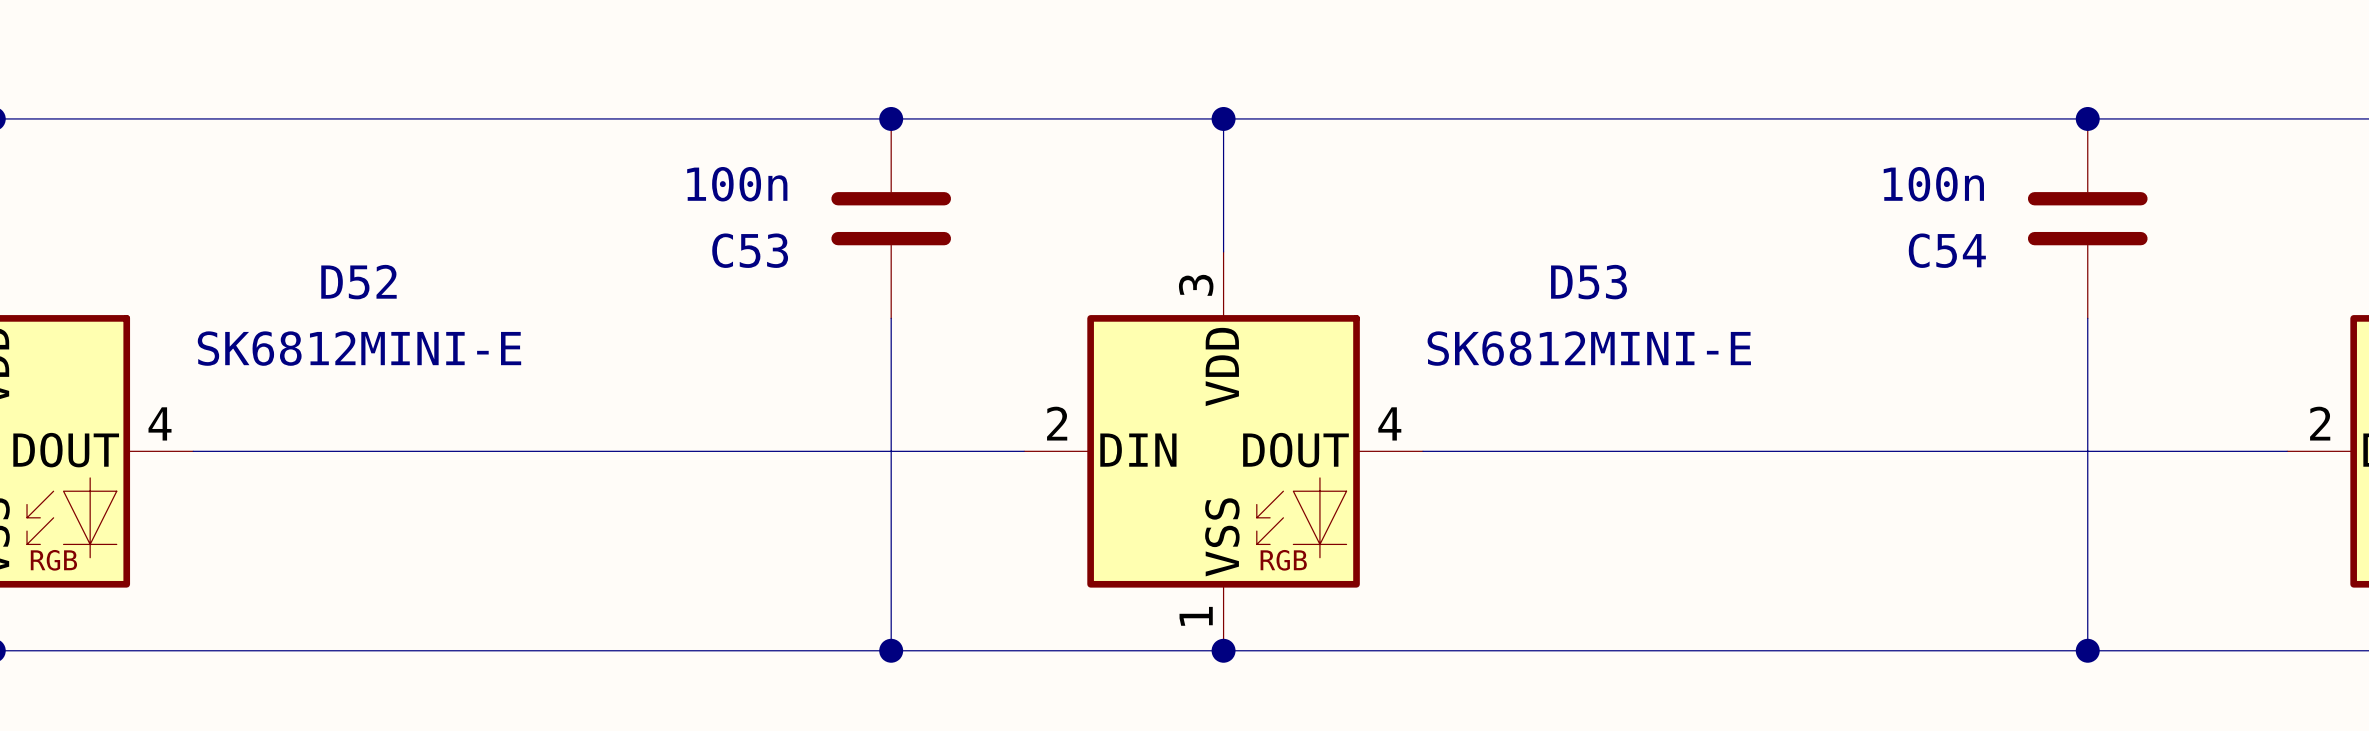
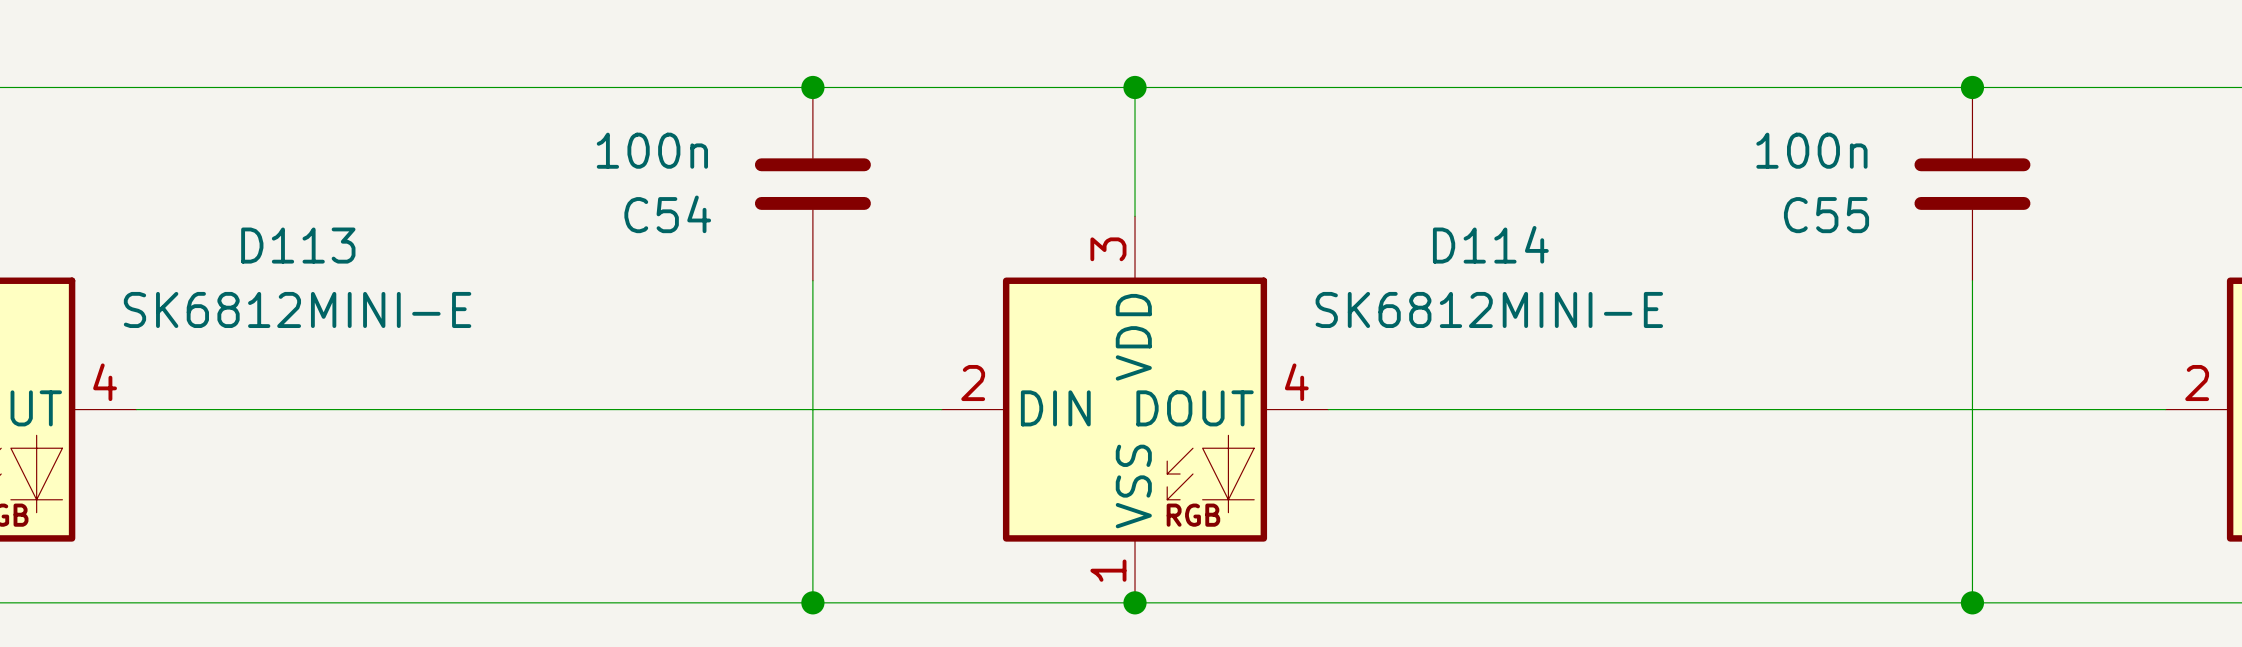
C53 name: C53 (750, 250) -> C54 (667, 214)
C54 name: C54 (1947, 250) -> C55 (1826, 215)
D52 name: D52 (358, 282) -> D113 (298, 245)
D53 name: D53 (1588, 282) -> D114 (1490, 244)

